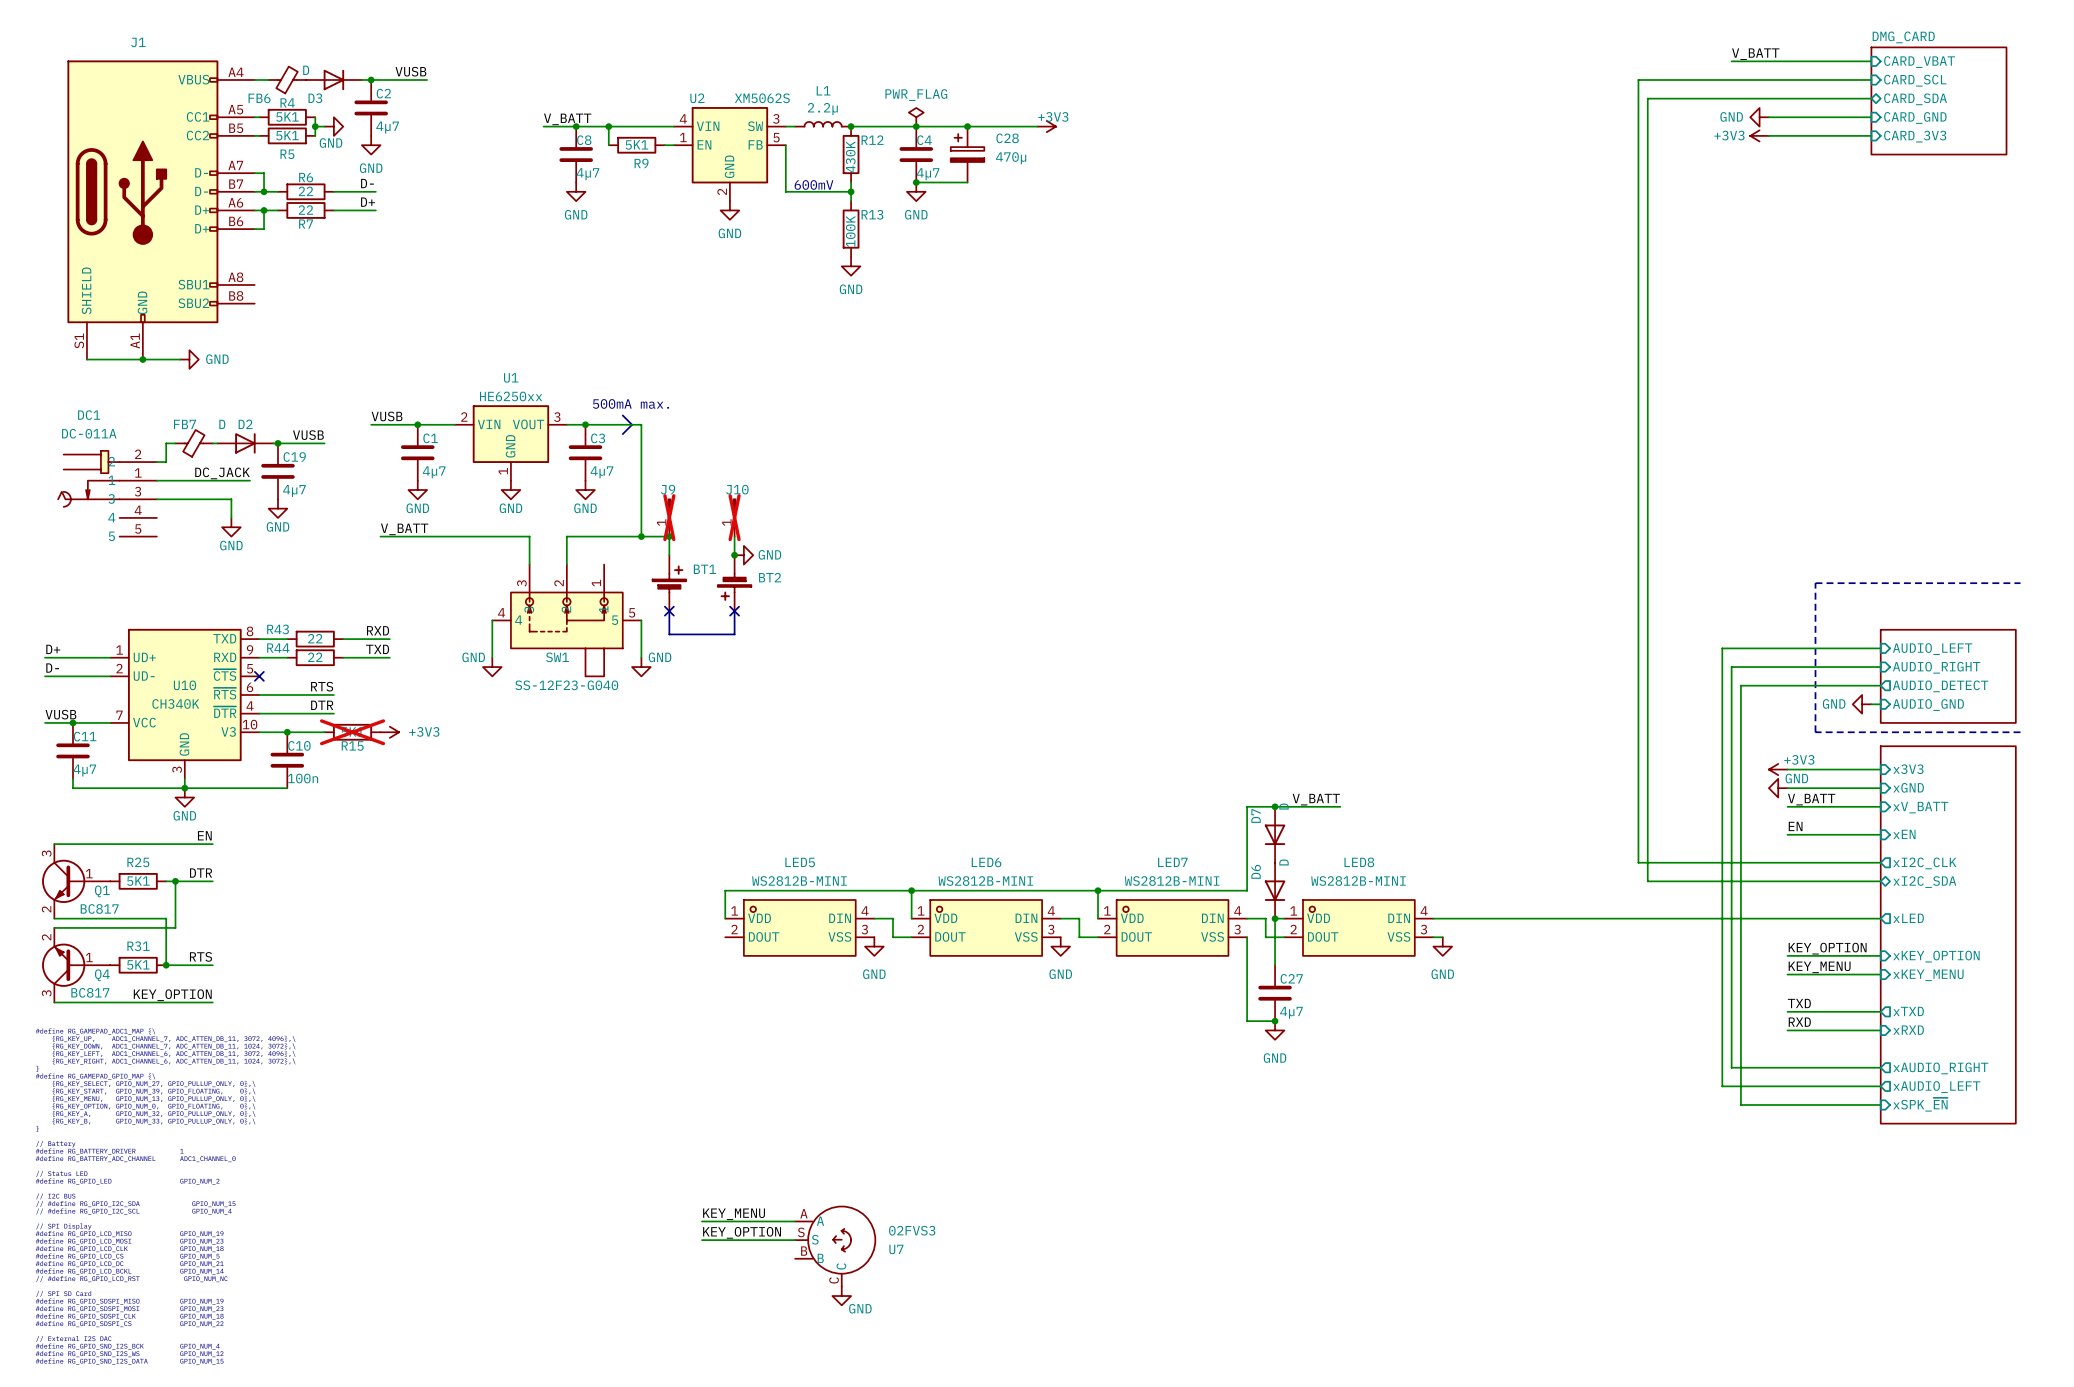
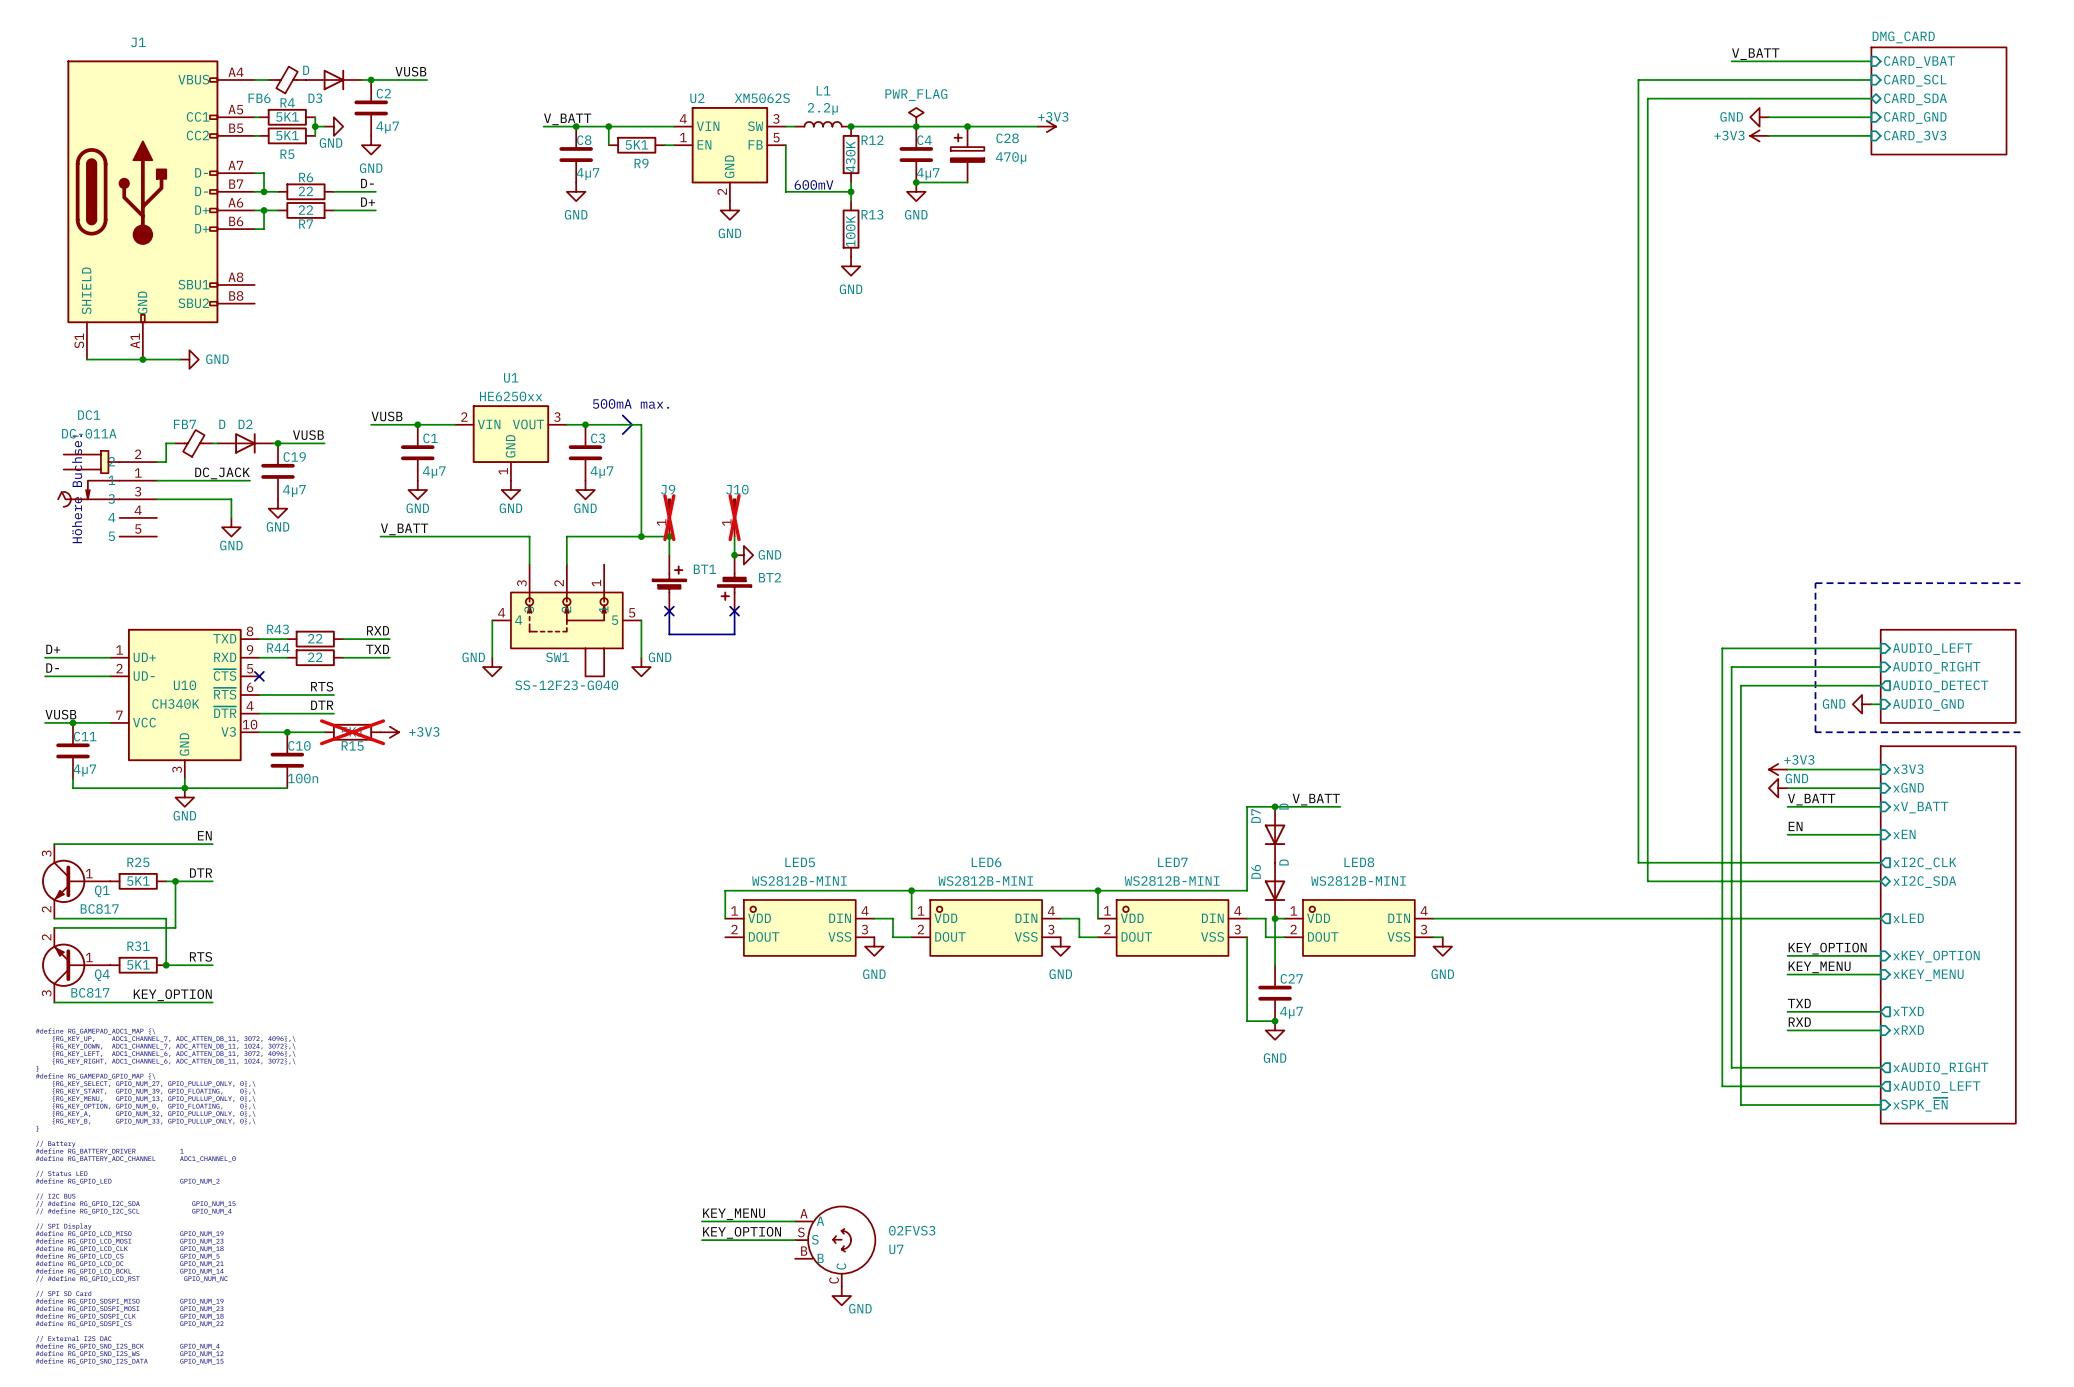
text: none -> Höhere Buchse! (77, 489)

